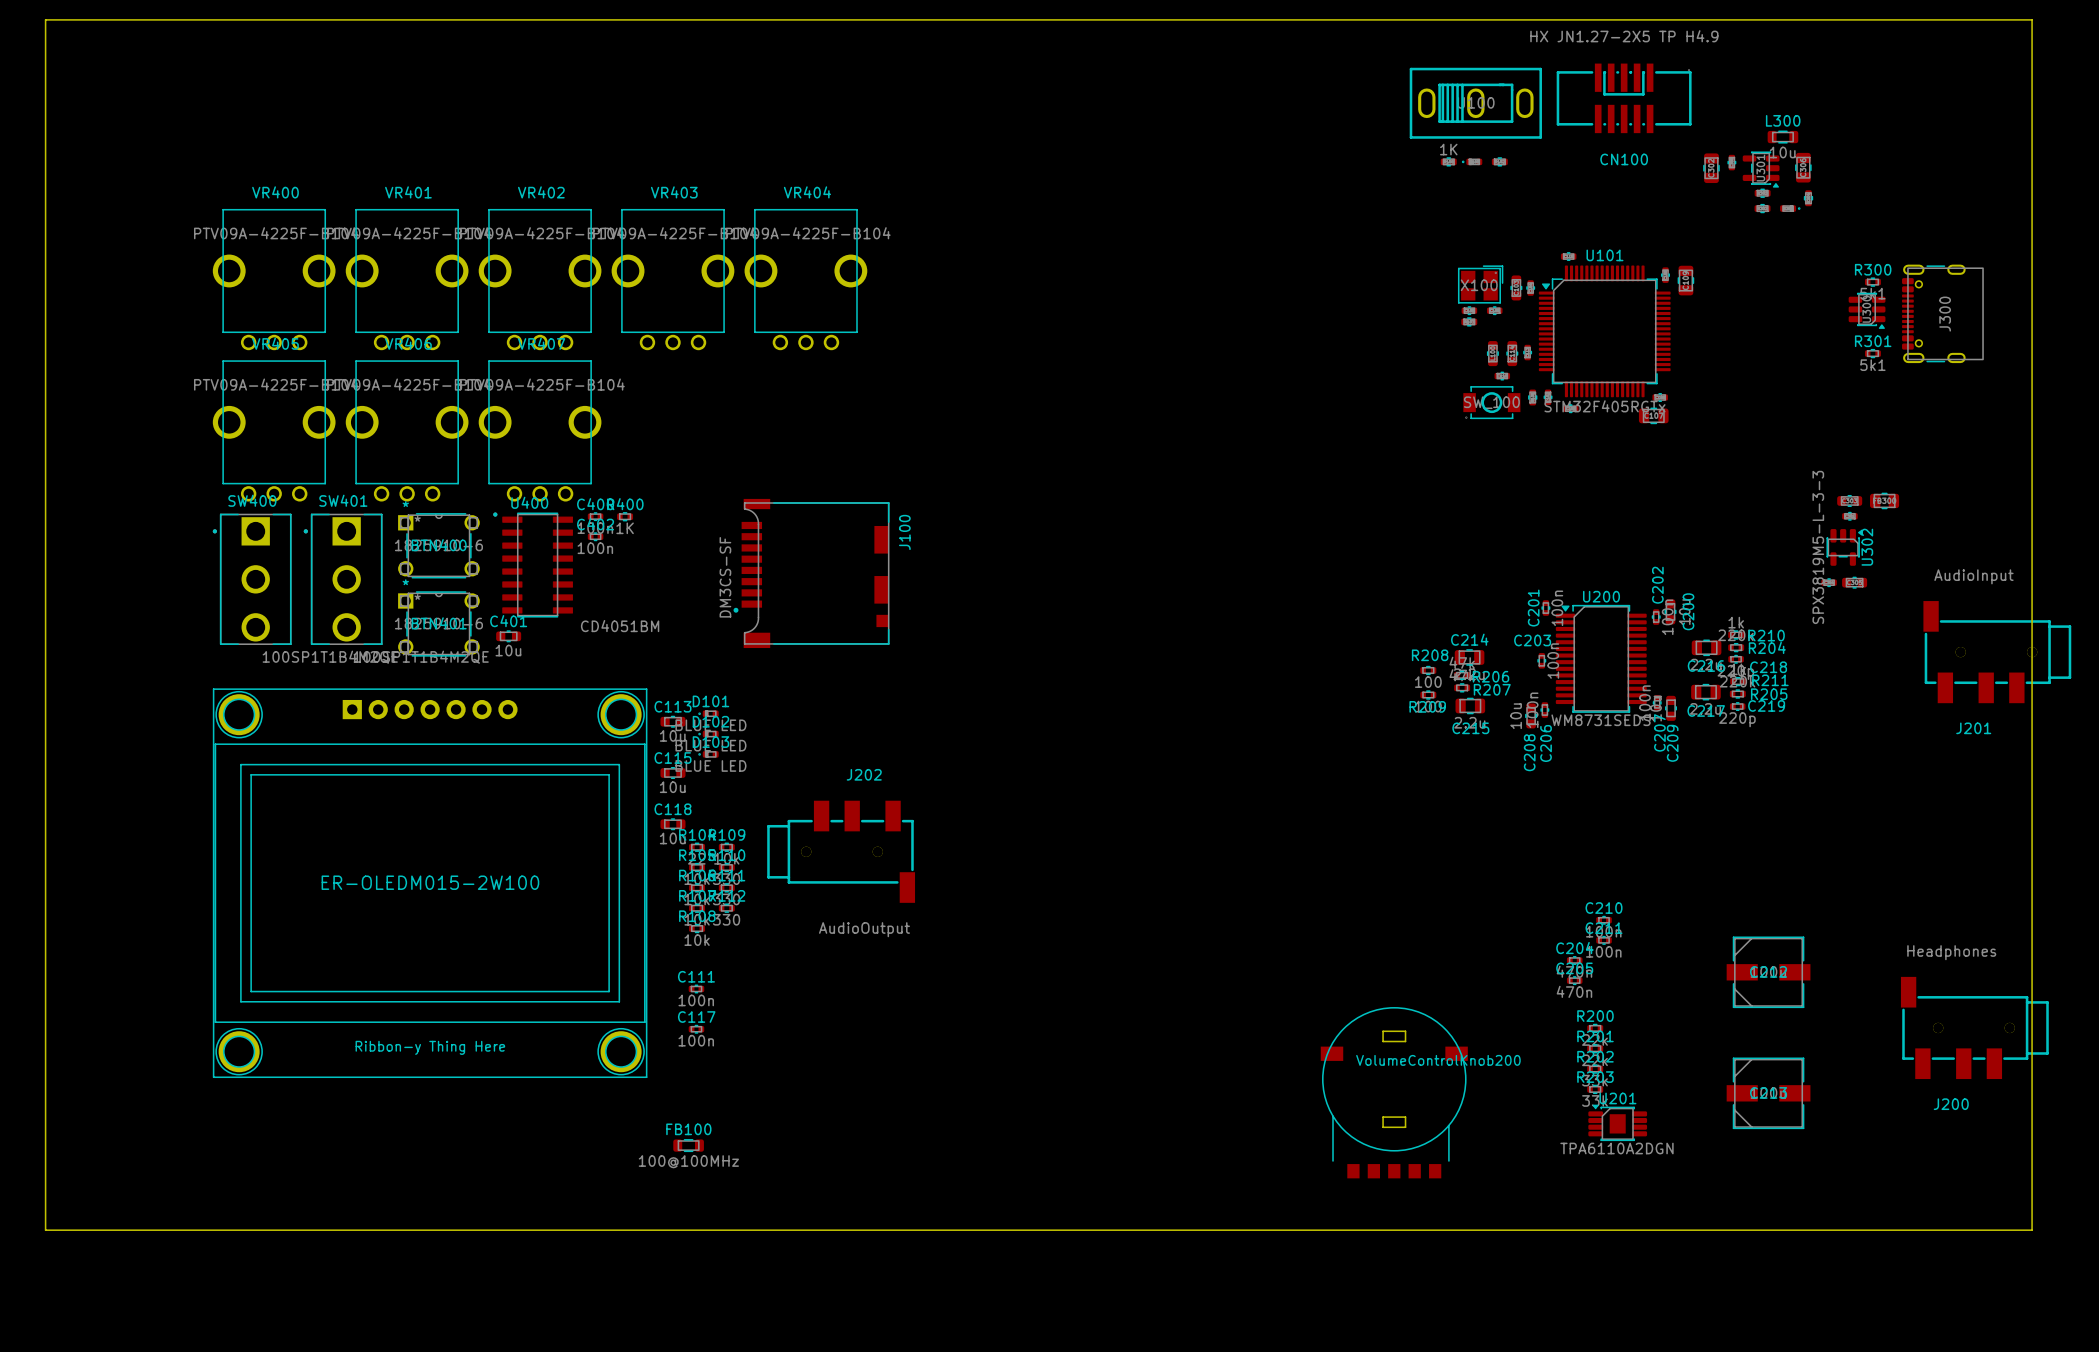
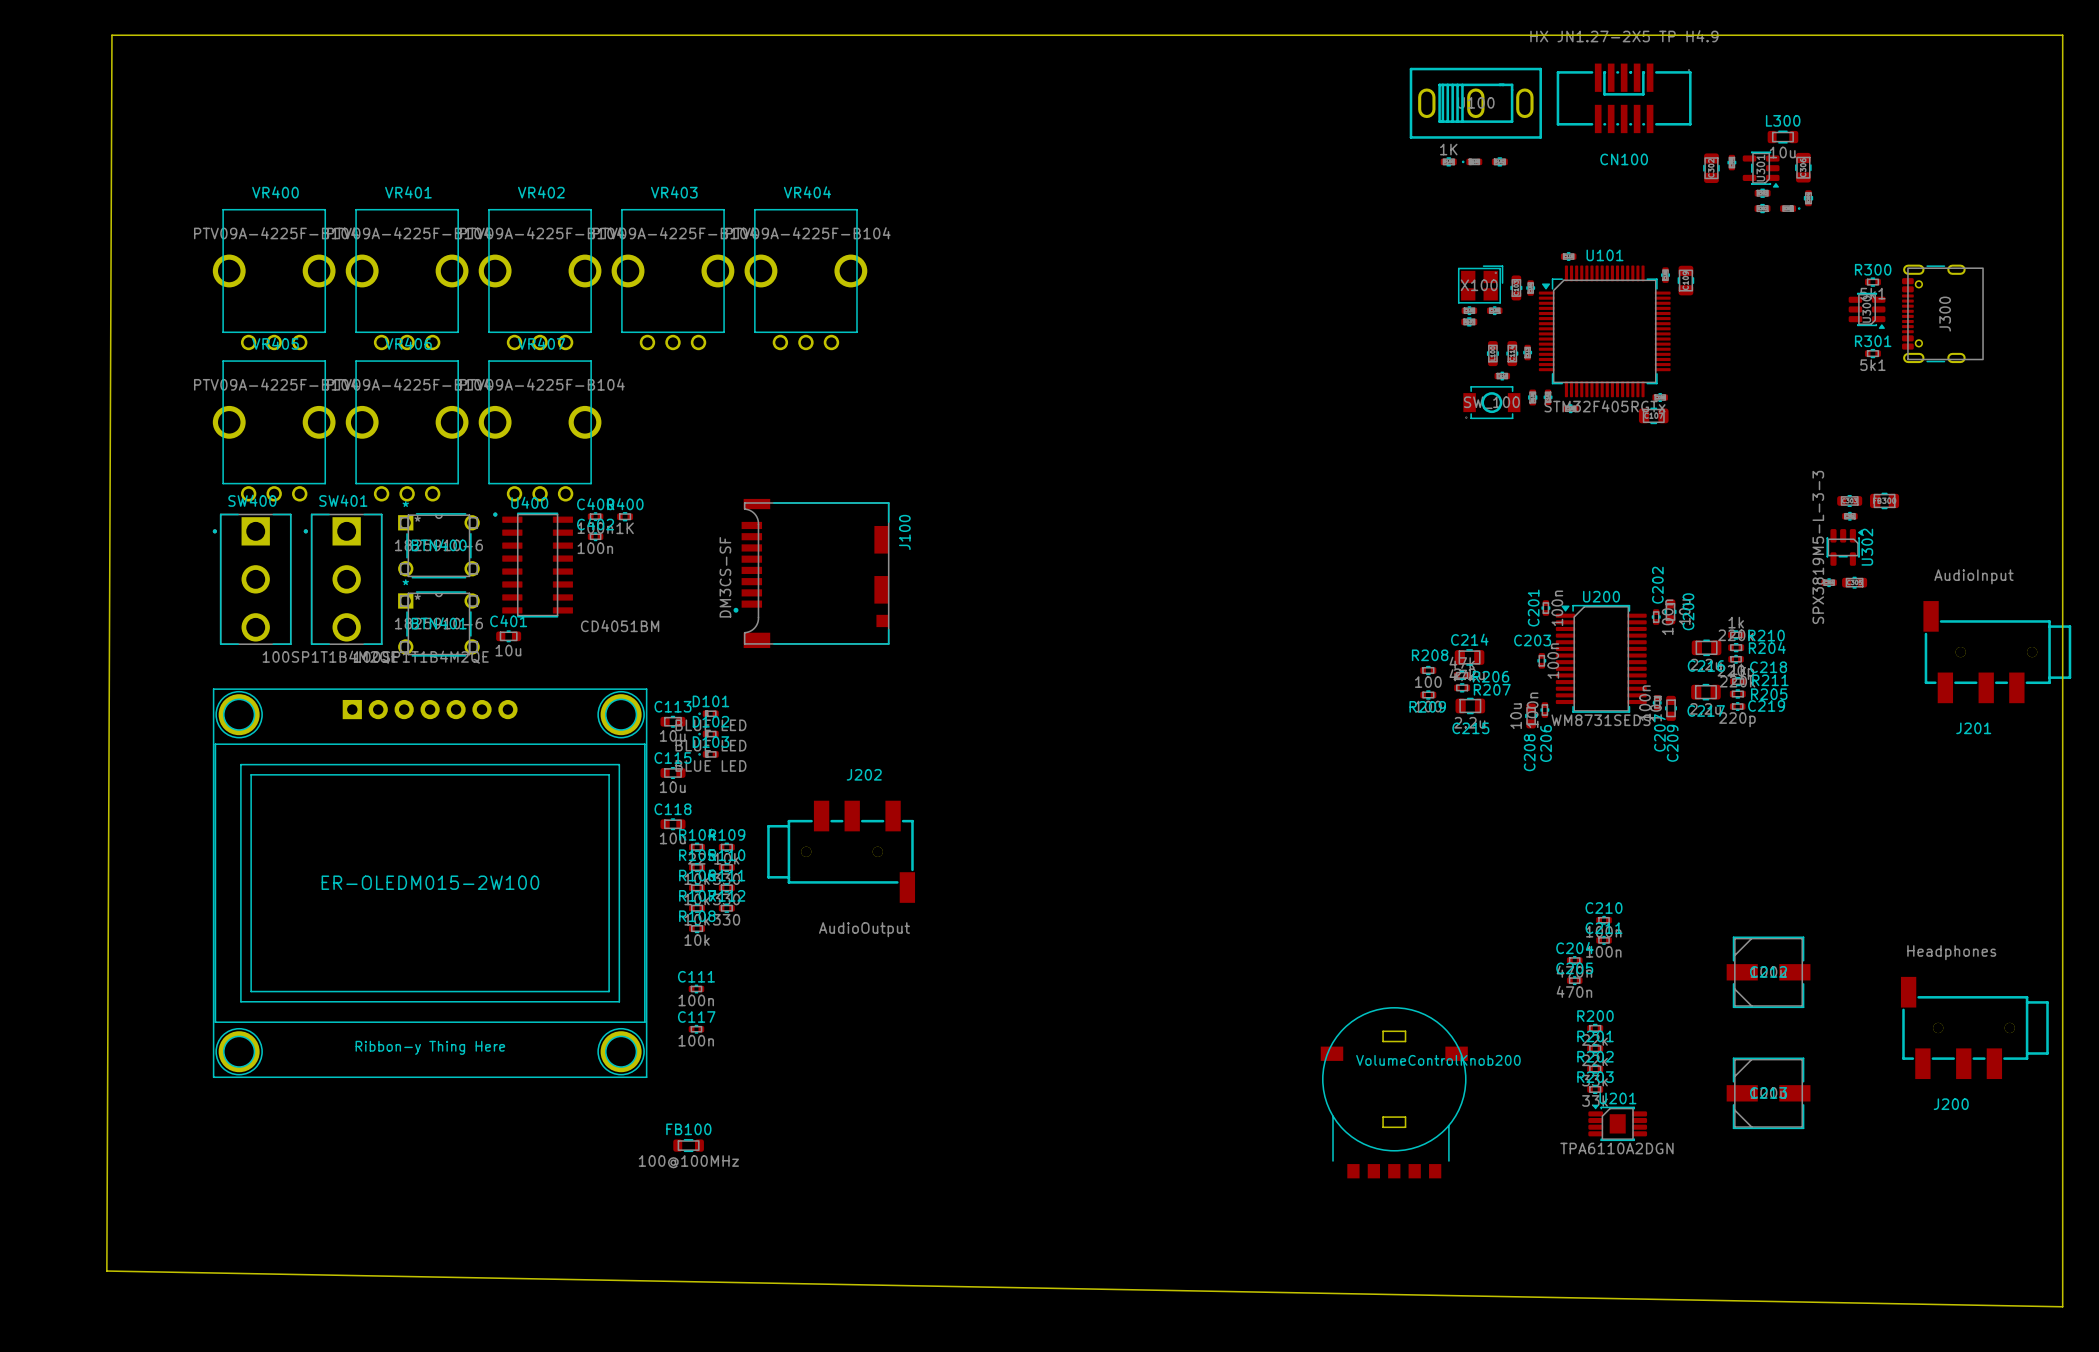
board edge: (45, 19) (2032, 19) (2032, 1230) (45, 1230) (45, 19) -> (111, 35) (106, 1271) (2062, 1306) (2062, 35) (111, 35)

